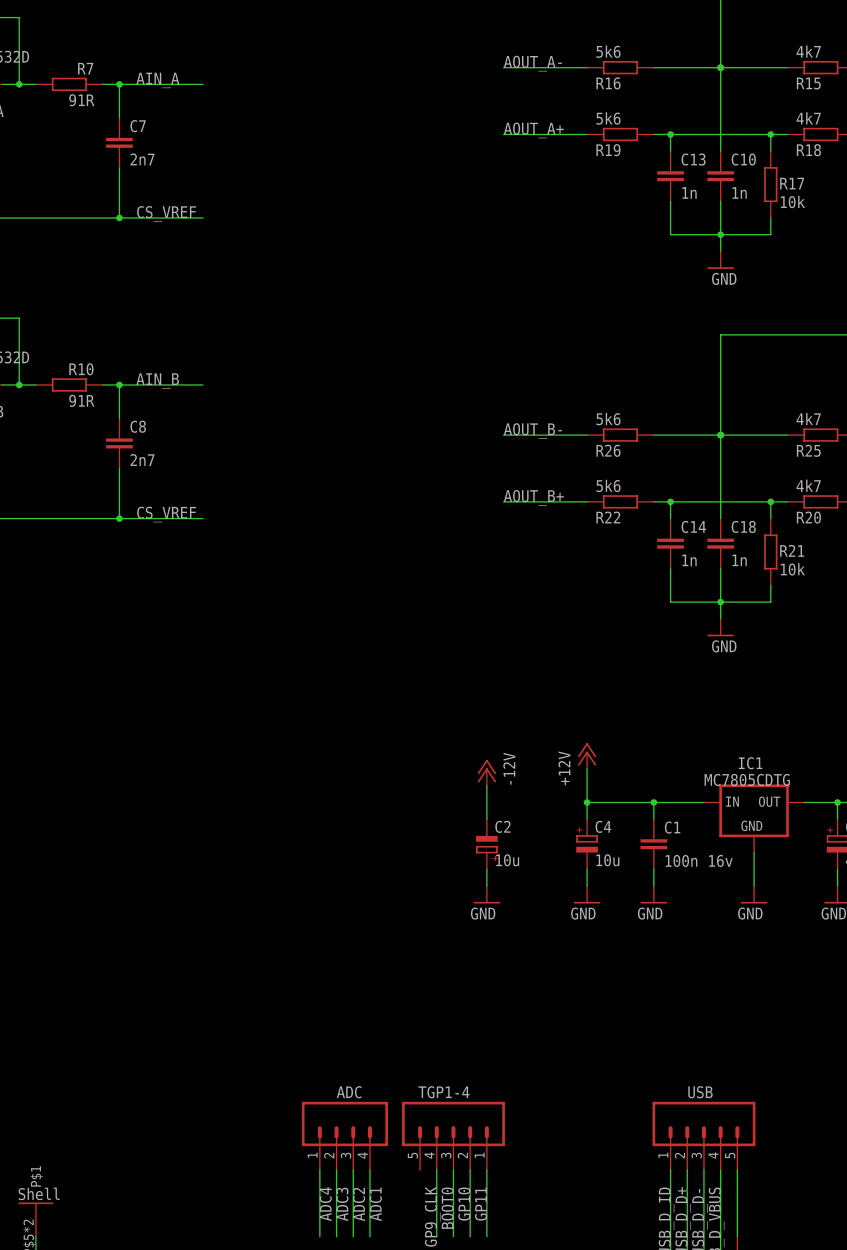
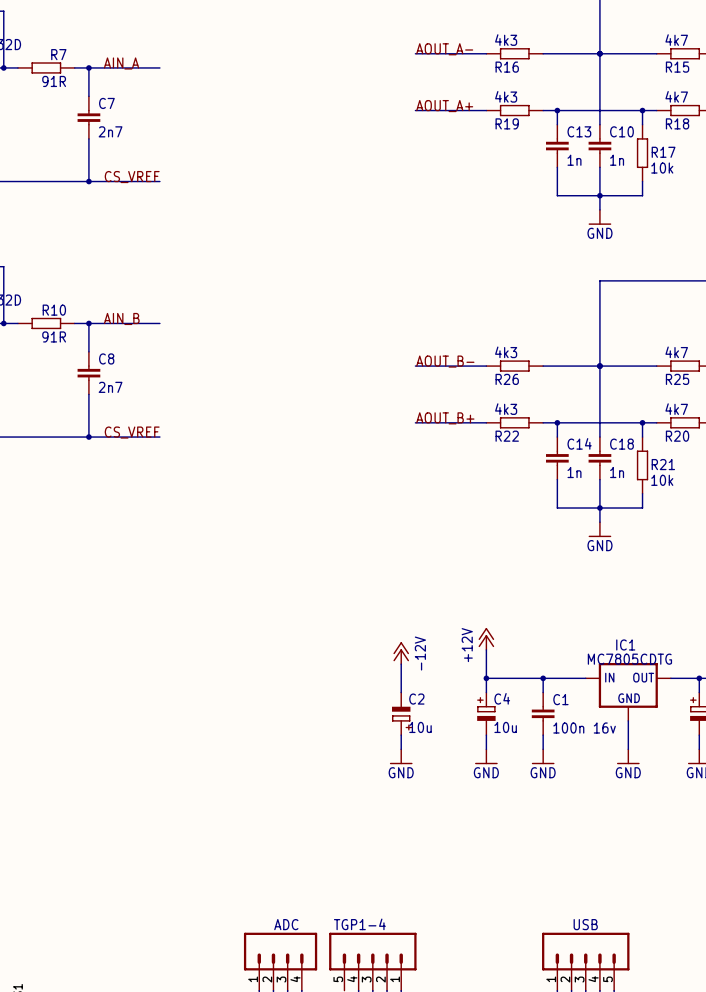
R16 value: 5k6 (608, 51) -> 4k3 (506, 40)
R19 value: 5k6 (608, 118) -> 4k3 (506, 96)
R26 value: 5k6 (608, 419) -> 4k3 (506, 352)
R22 value: 5k6 (608, 485) -> 4k3 (506, 409)

